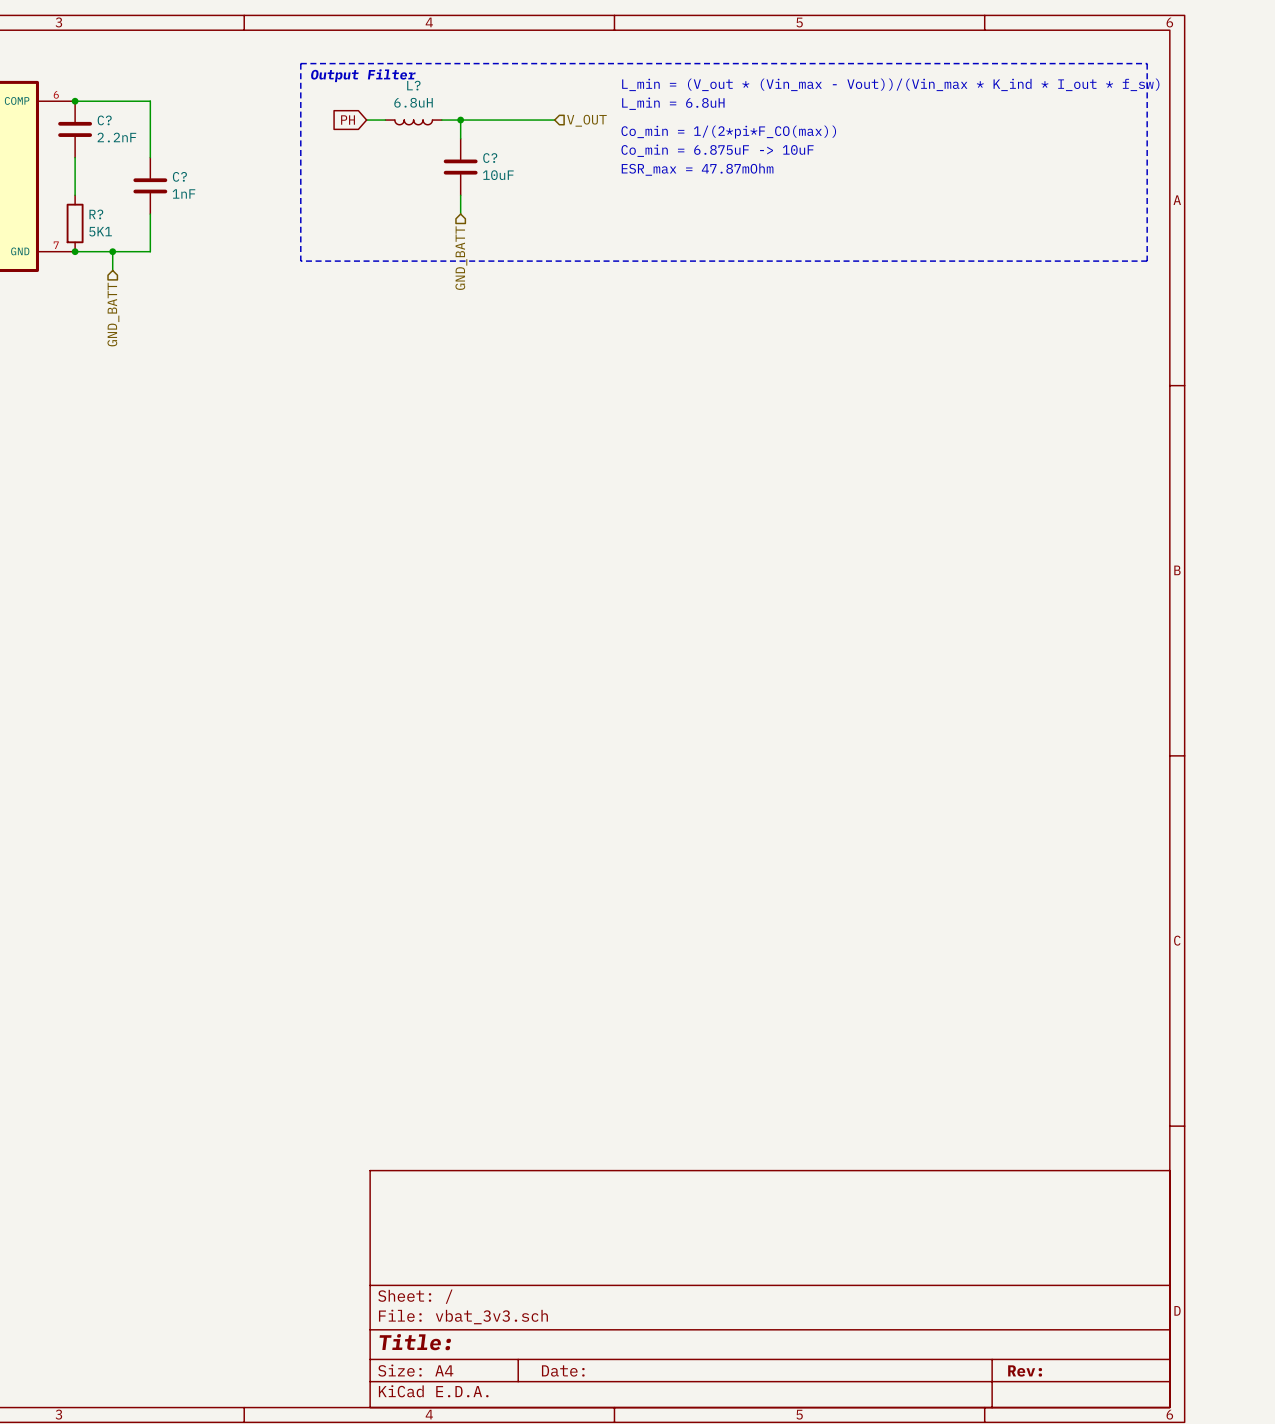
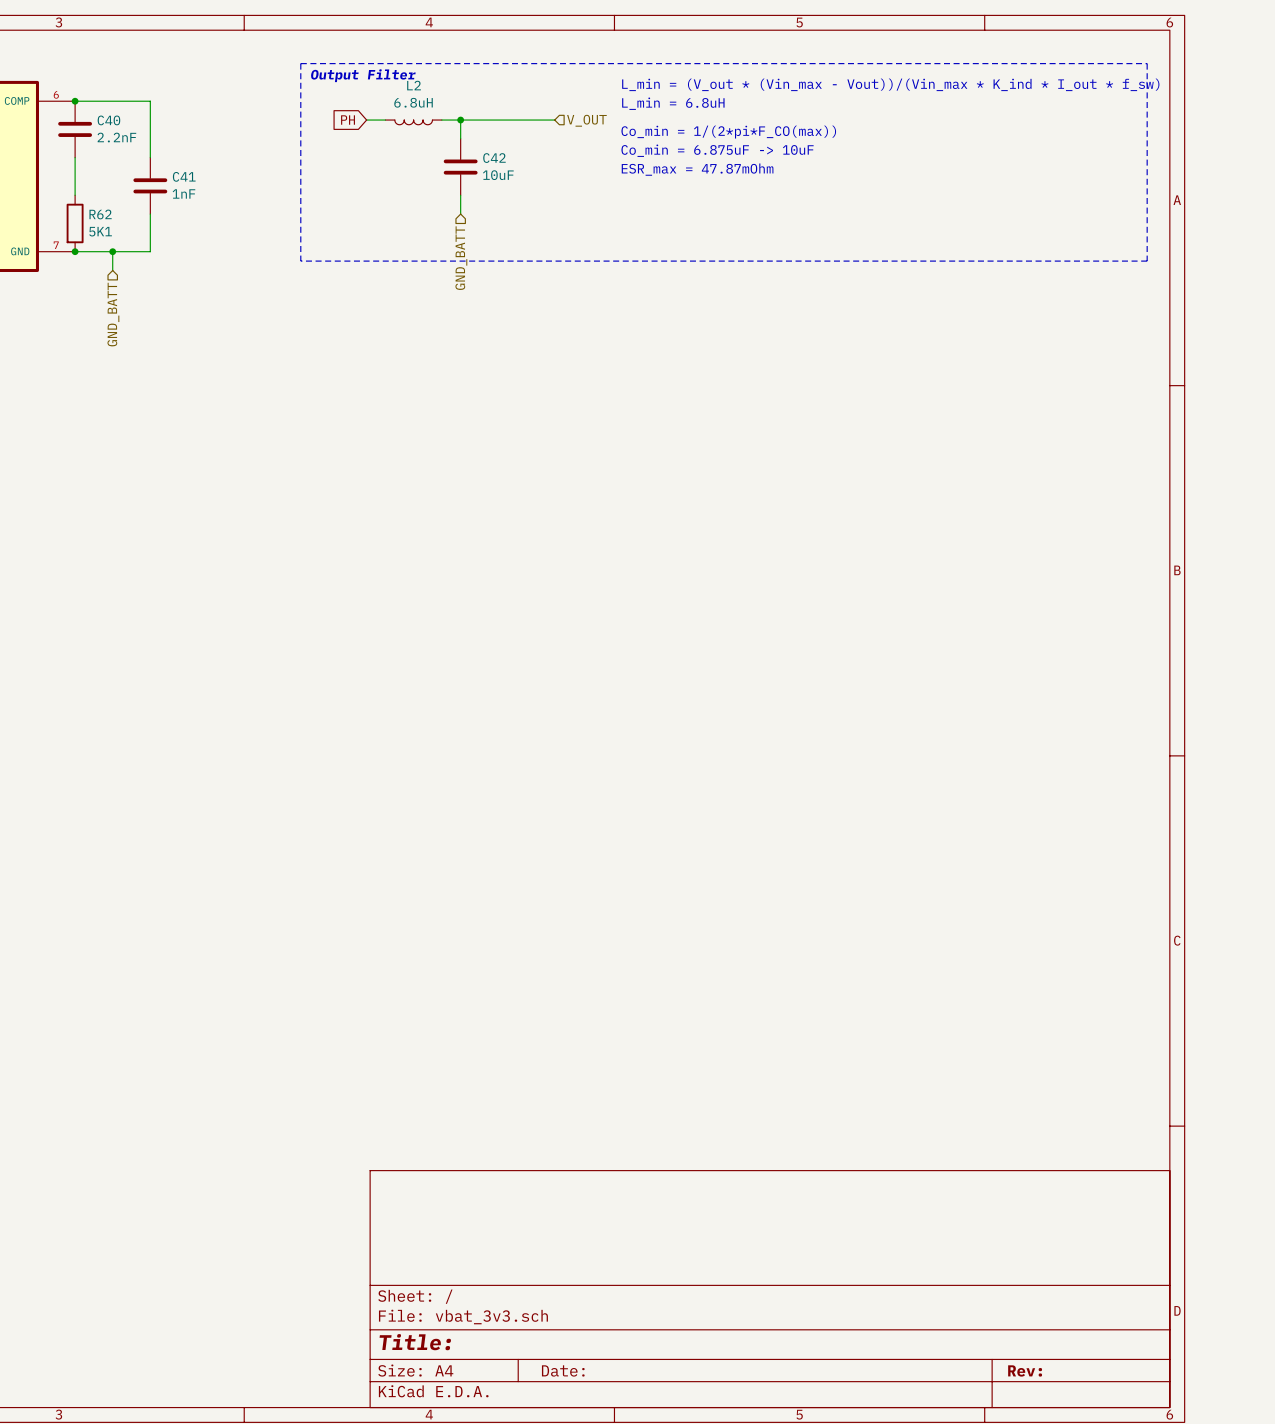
L? name: L? (413, 85) -> L2 (414, 85)
C? name: C? (104, 120) -> C40 (108, 120)
C? name: C? (490, 158) -> C42 (494, 158)
C? name: C? (179, 176) -> C41 (184, 176)
R? name: R? (96, 214) -> R62 (100, 214)

